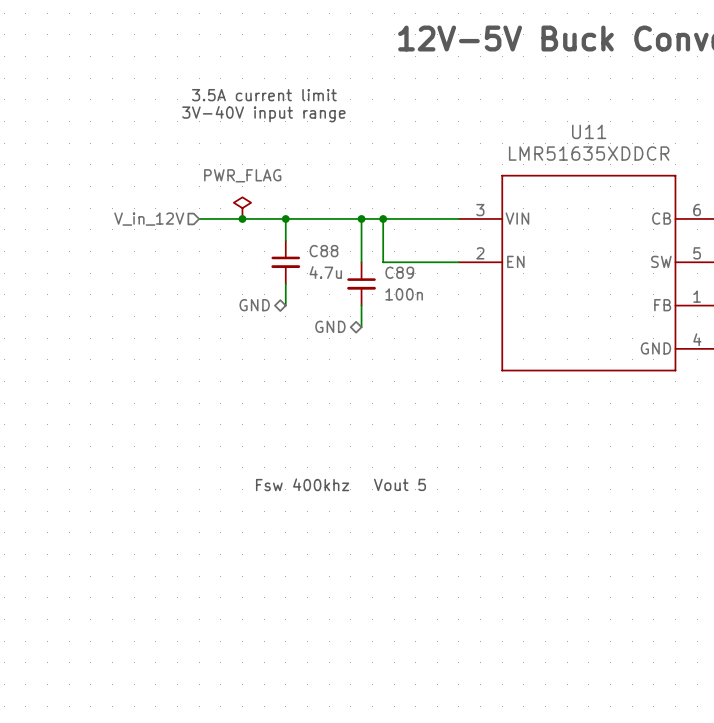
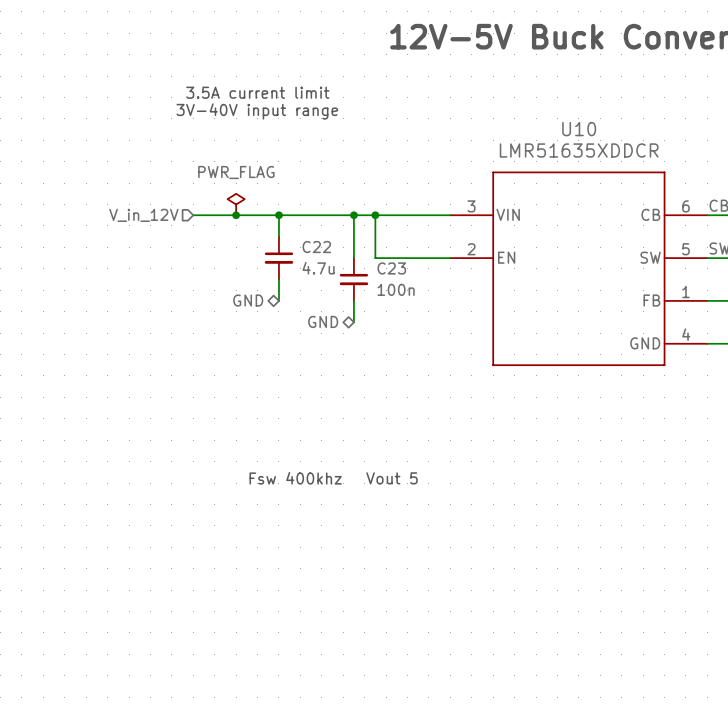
U11 name: U11 (589, 131) -> U10 (579, 129)
C88 name: C88 (323, 251) -> C22 (316, 247)
C89 name: C89 (399, 272) -> C23 (391, 268)

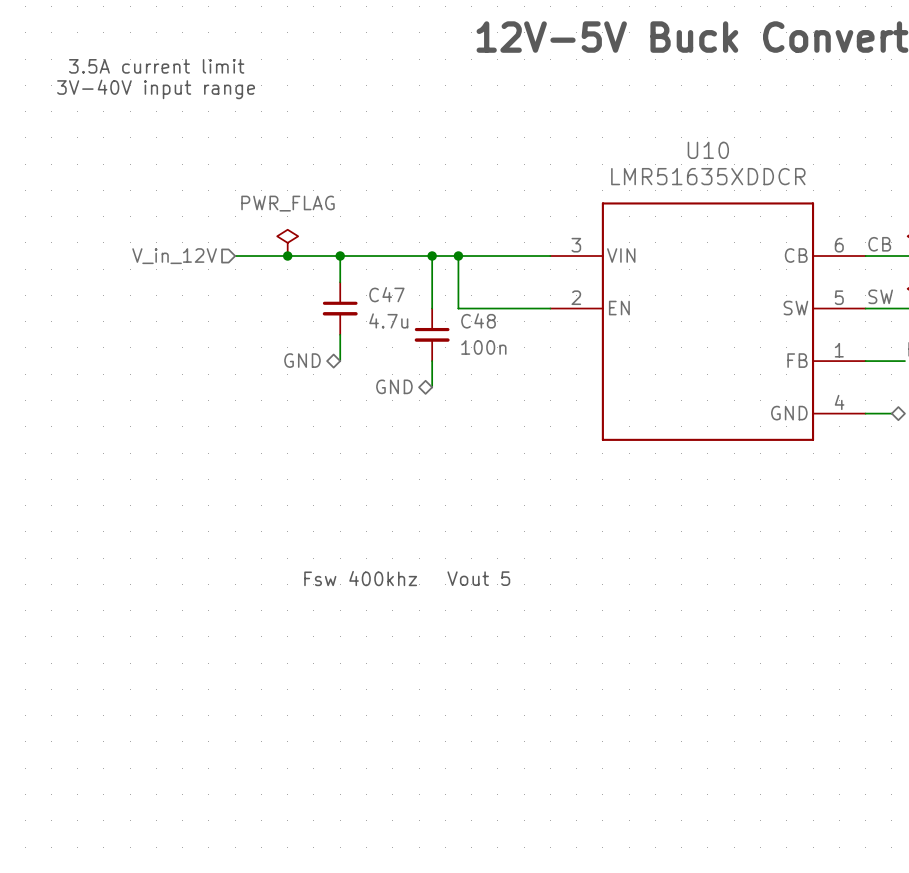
text position: 3.5A current limit (257, 92) -> 3.5A current limit (156, 66)
text position: 3V-40V input range (257, 111) -> 3V-40V input range (156, 89)
C22 name: C22 (316, 247) -> C47 (386, 294)
C23 name: C23 (391, 268) -> C48 (478, 320)

